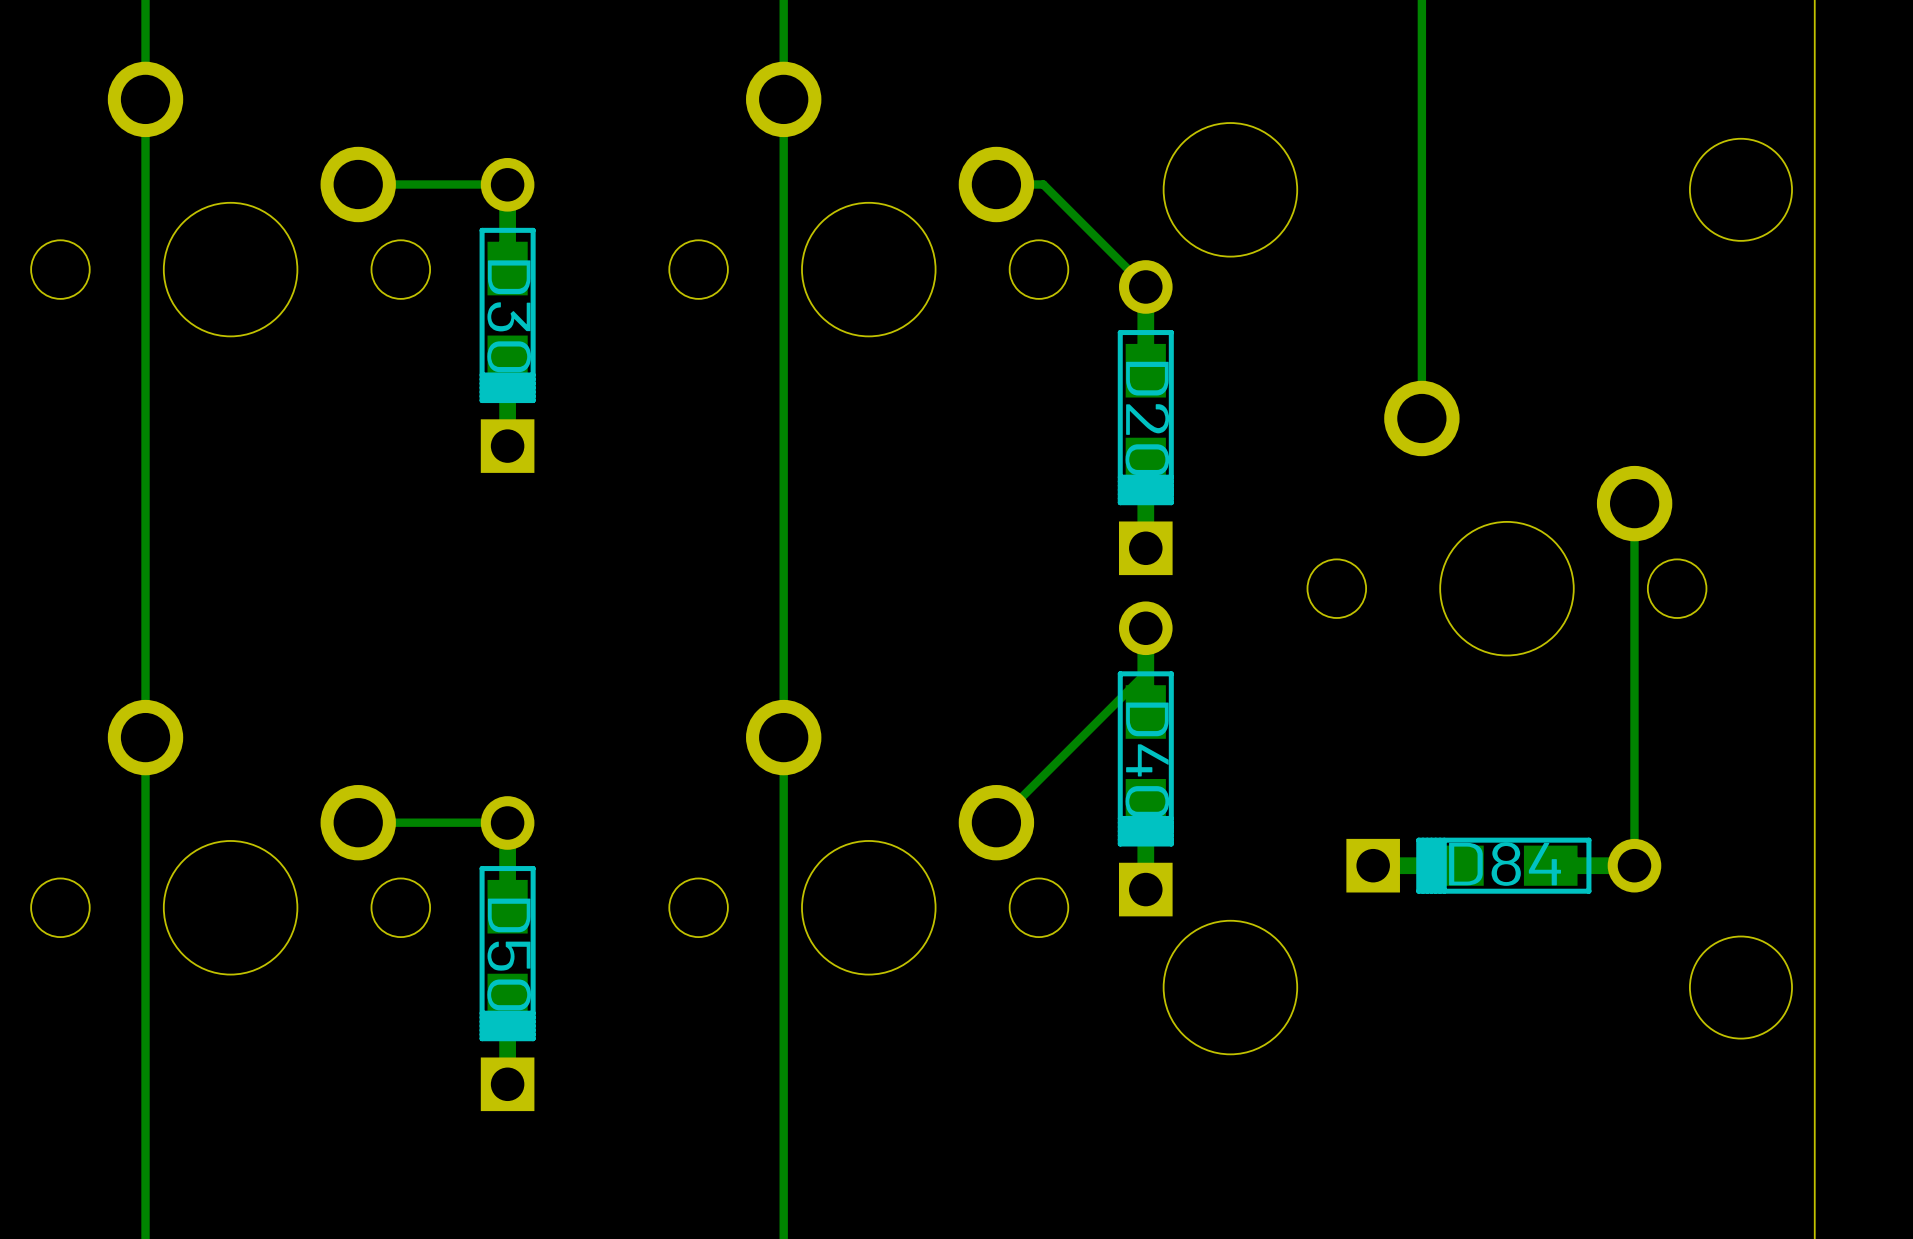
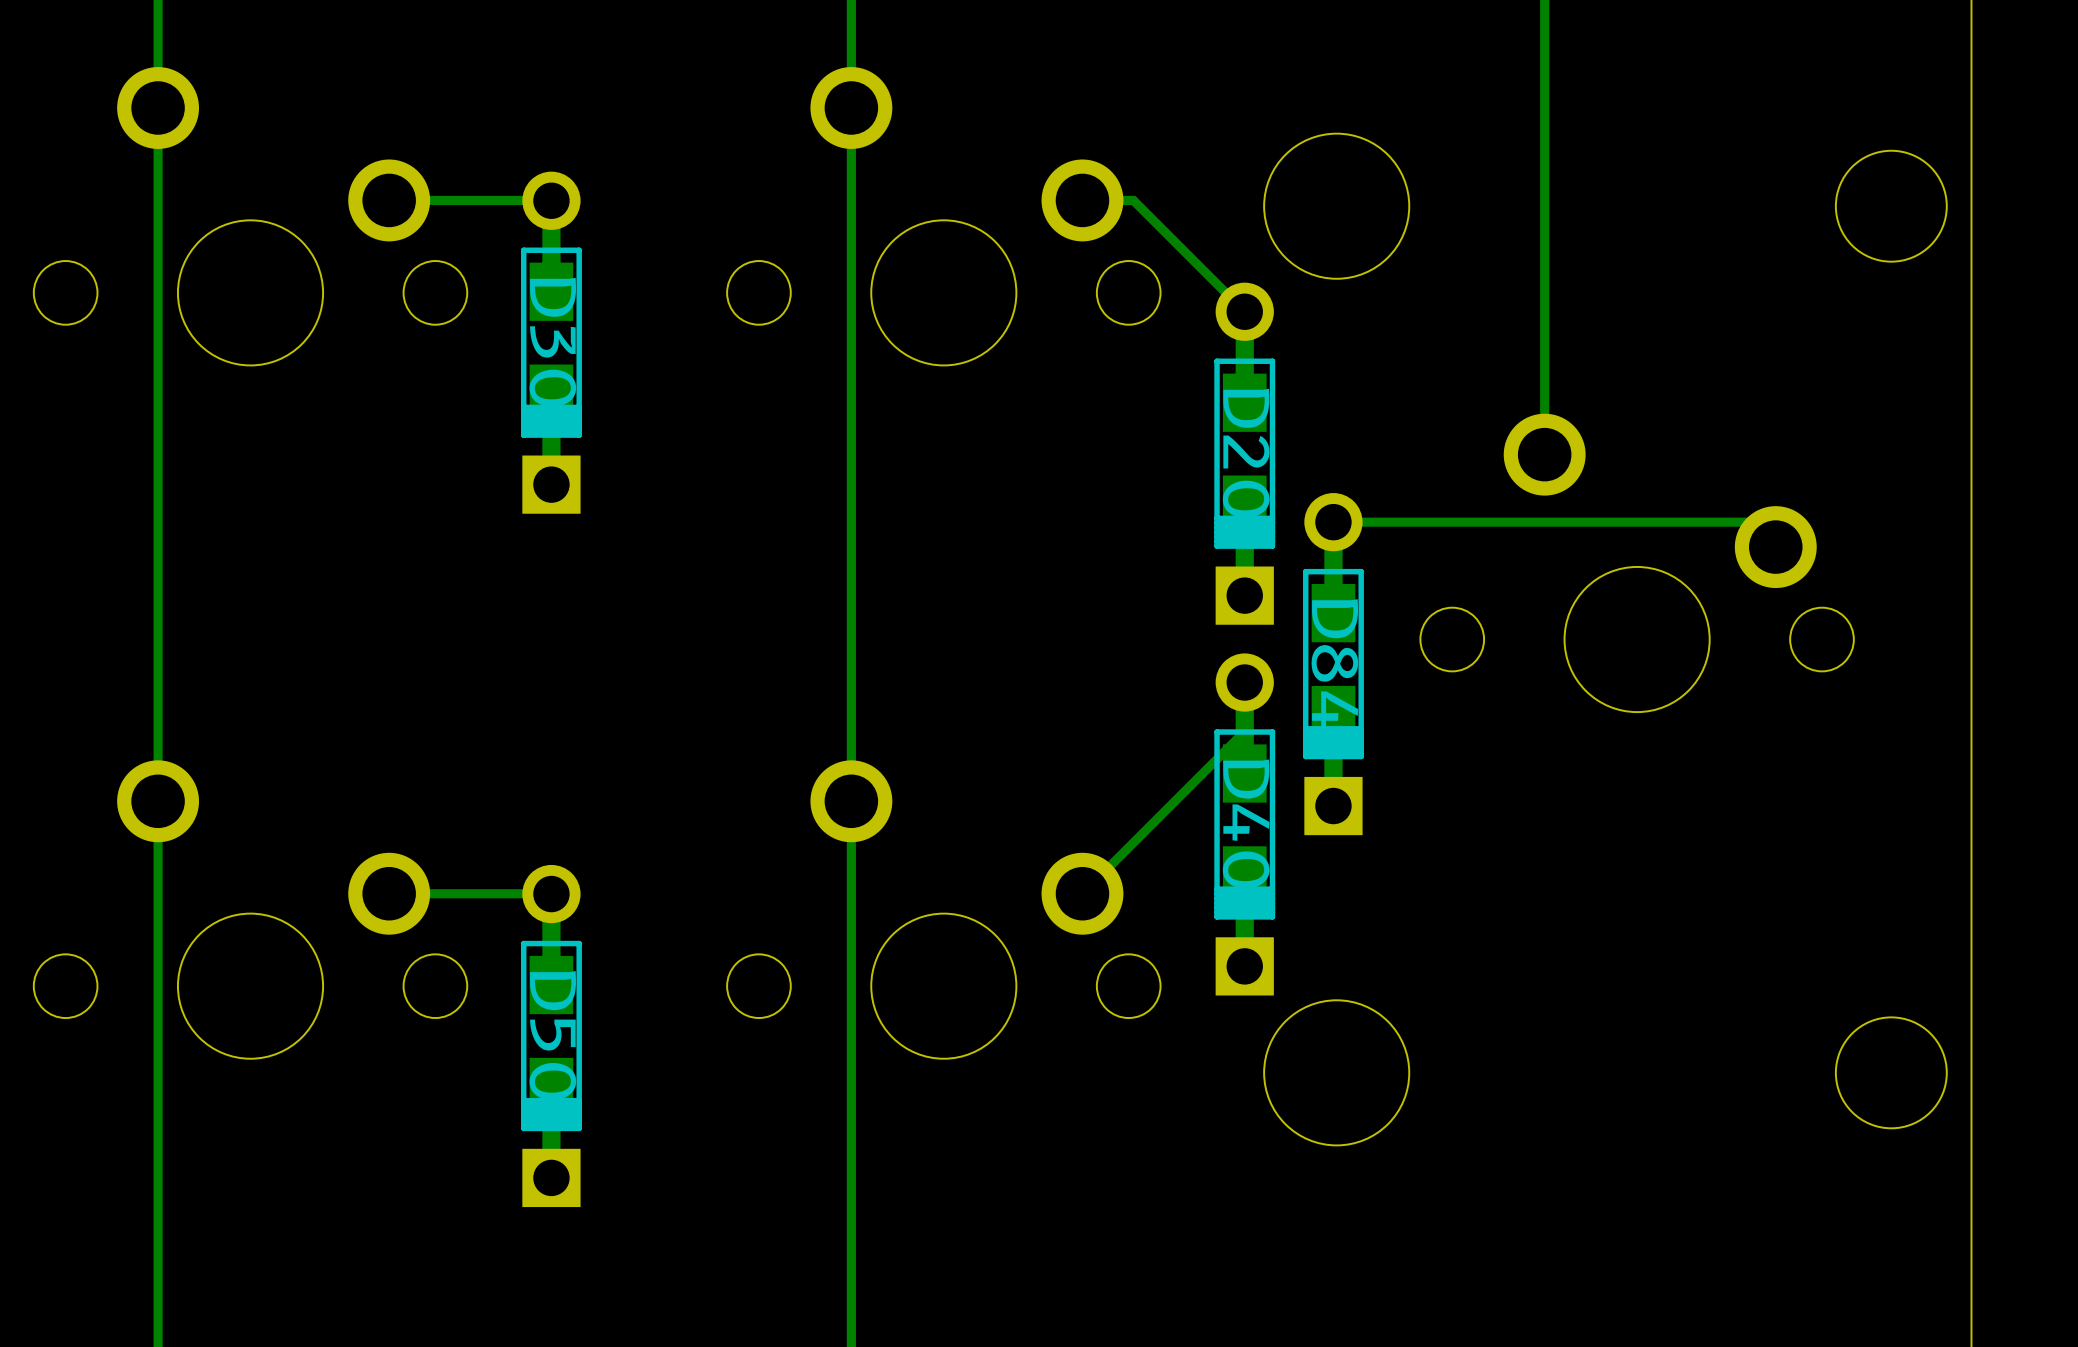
track: none -> (1750, 522) (1333, 522)
track: (1634, 503) (1634, 865) -> none
D84 rotation: 0° (1503, 865) -> 90° counterclockwise (1333, 664)
D84 position: (1503, 865) -> (1333, 664)

